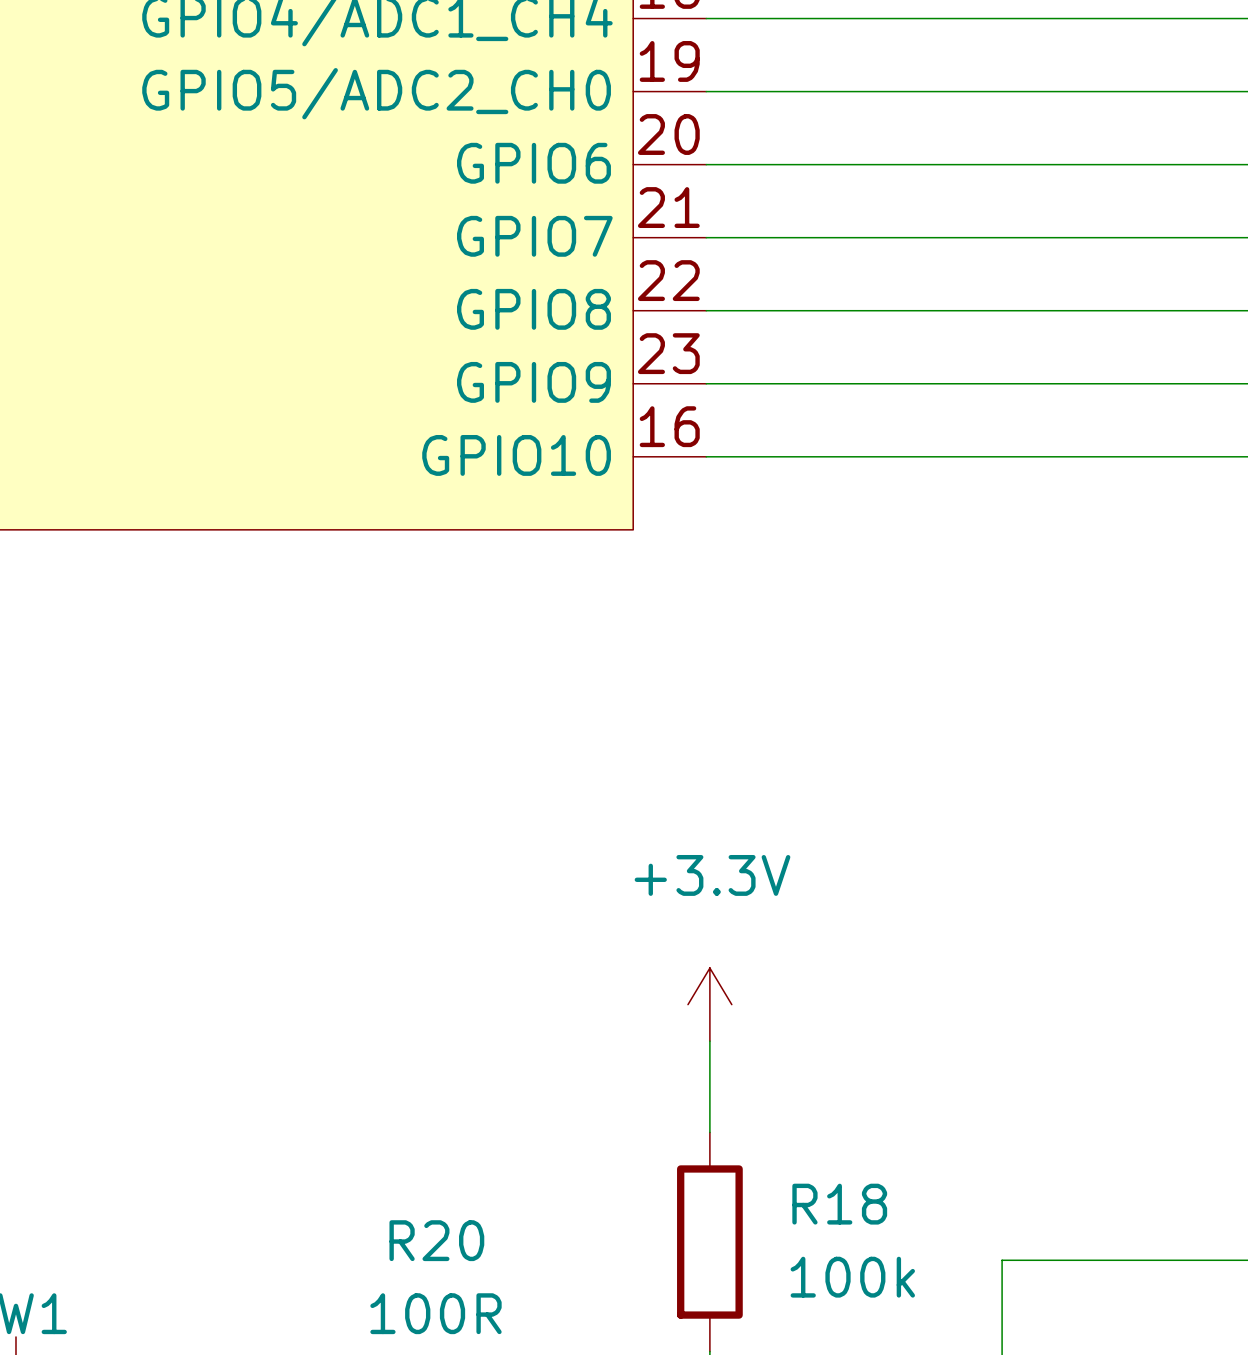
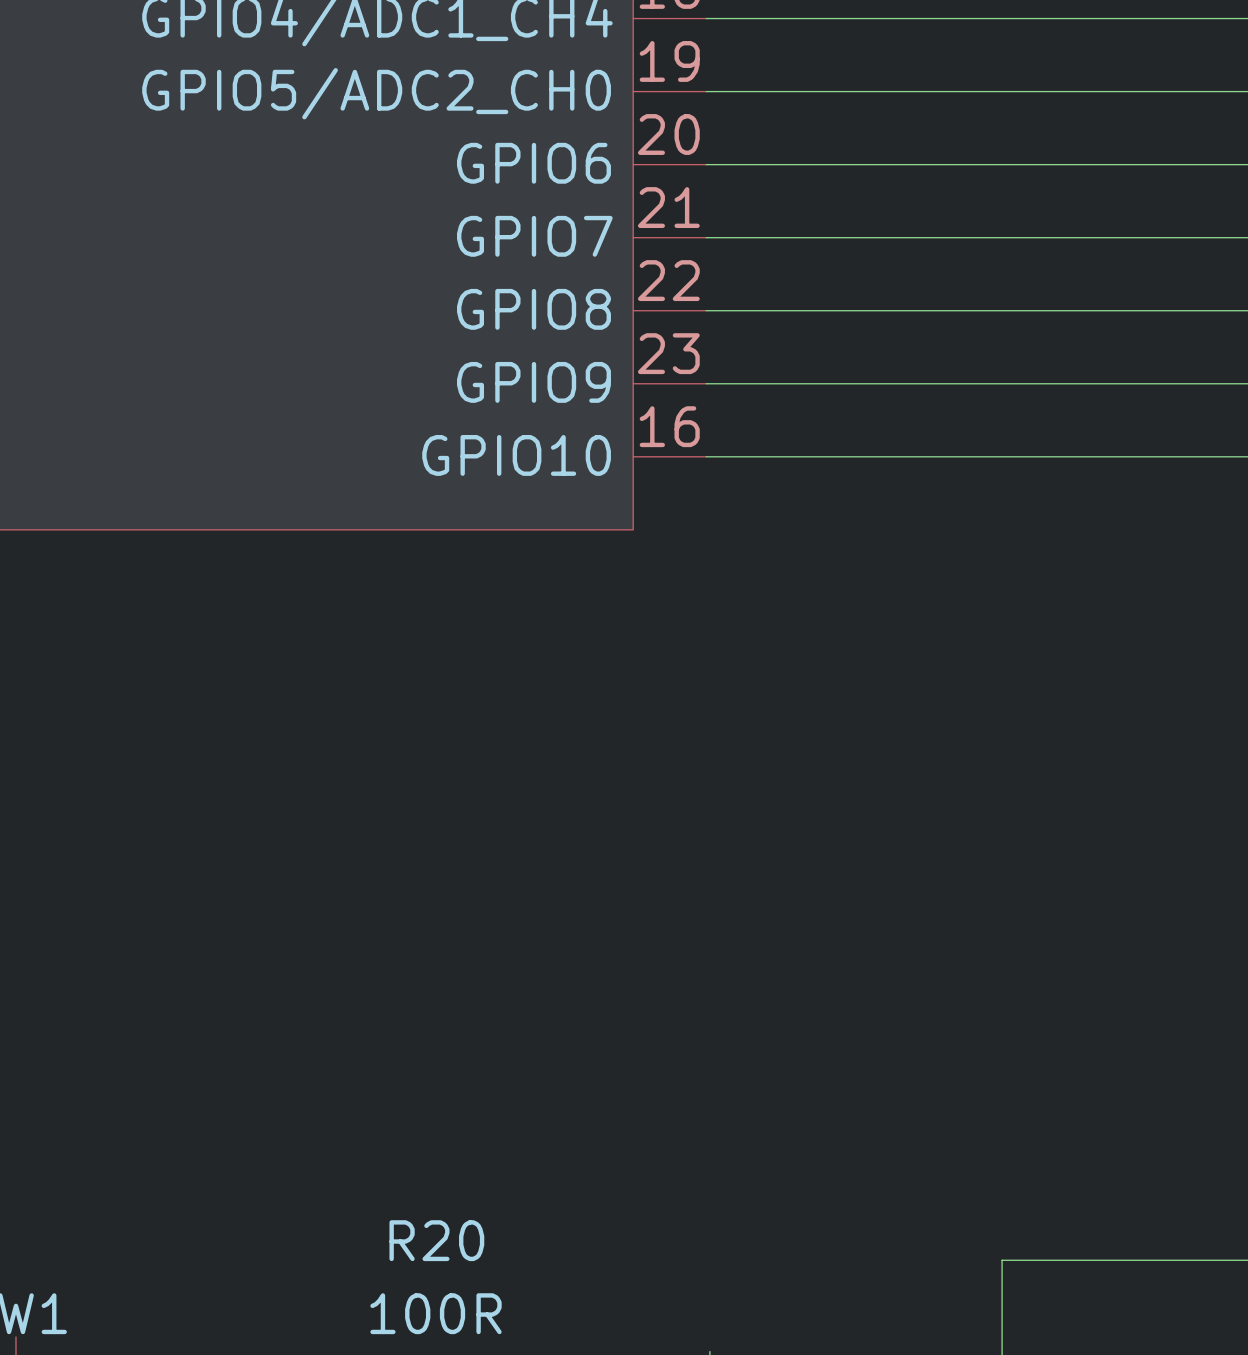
power symbol: +3.3V (709, 1004) -> none
wire: (709, 1041) (709, 1132) -> none
R18: 100k (709, 1242) -> none

